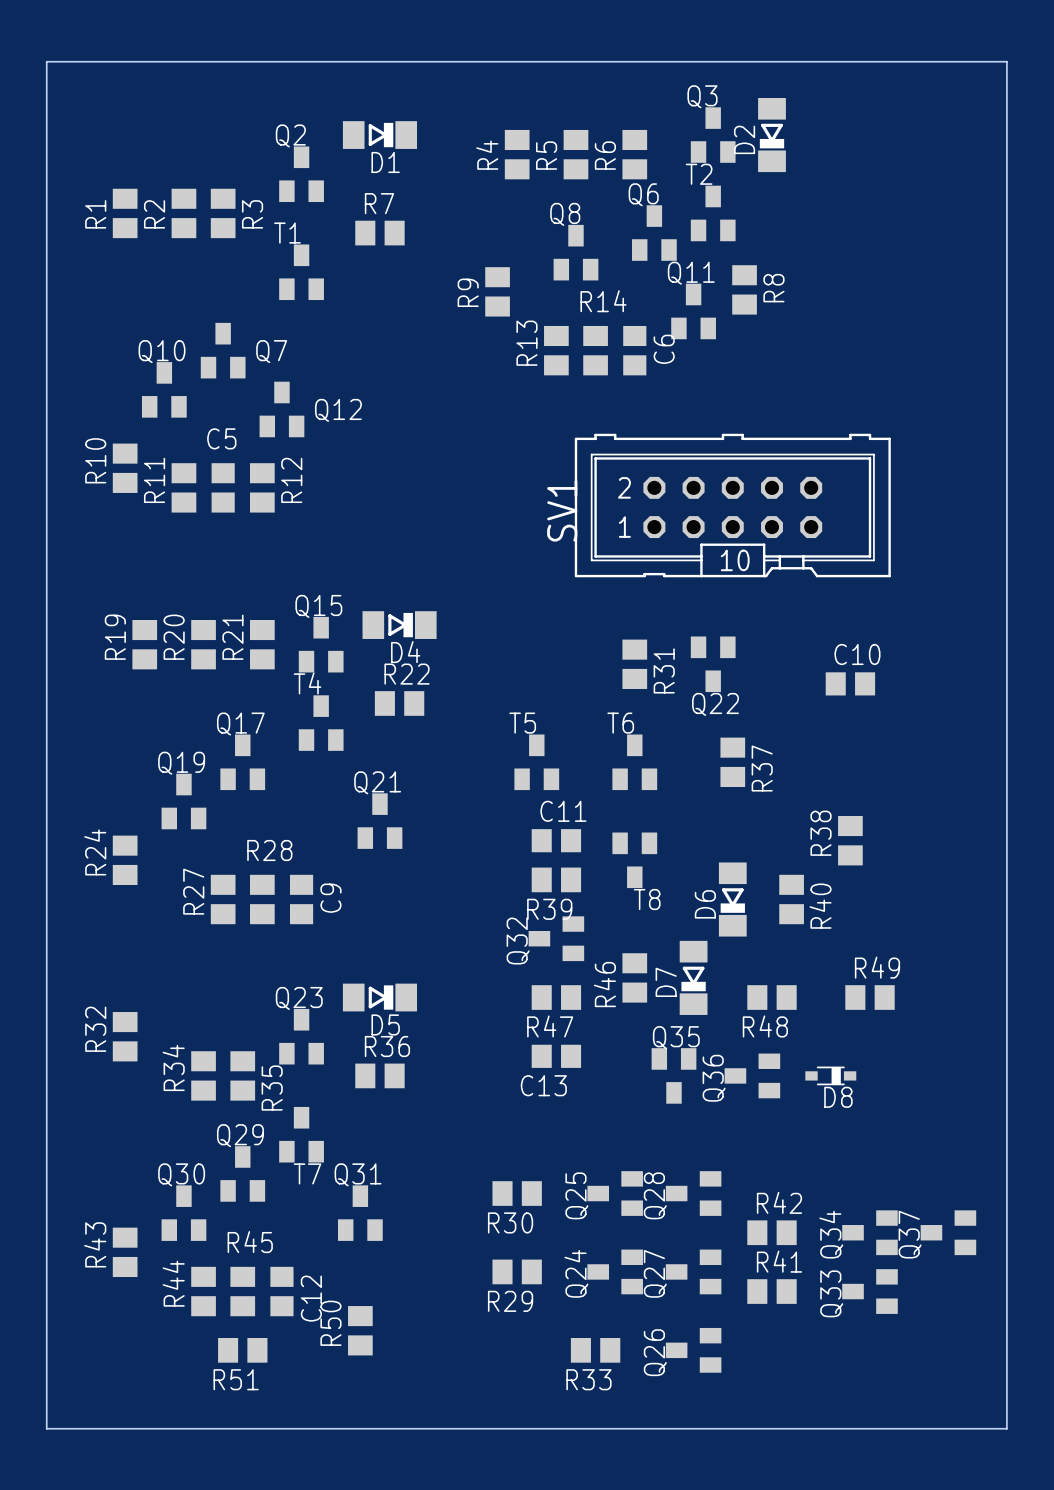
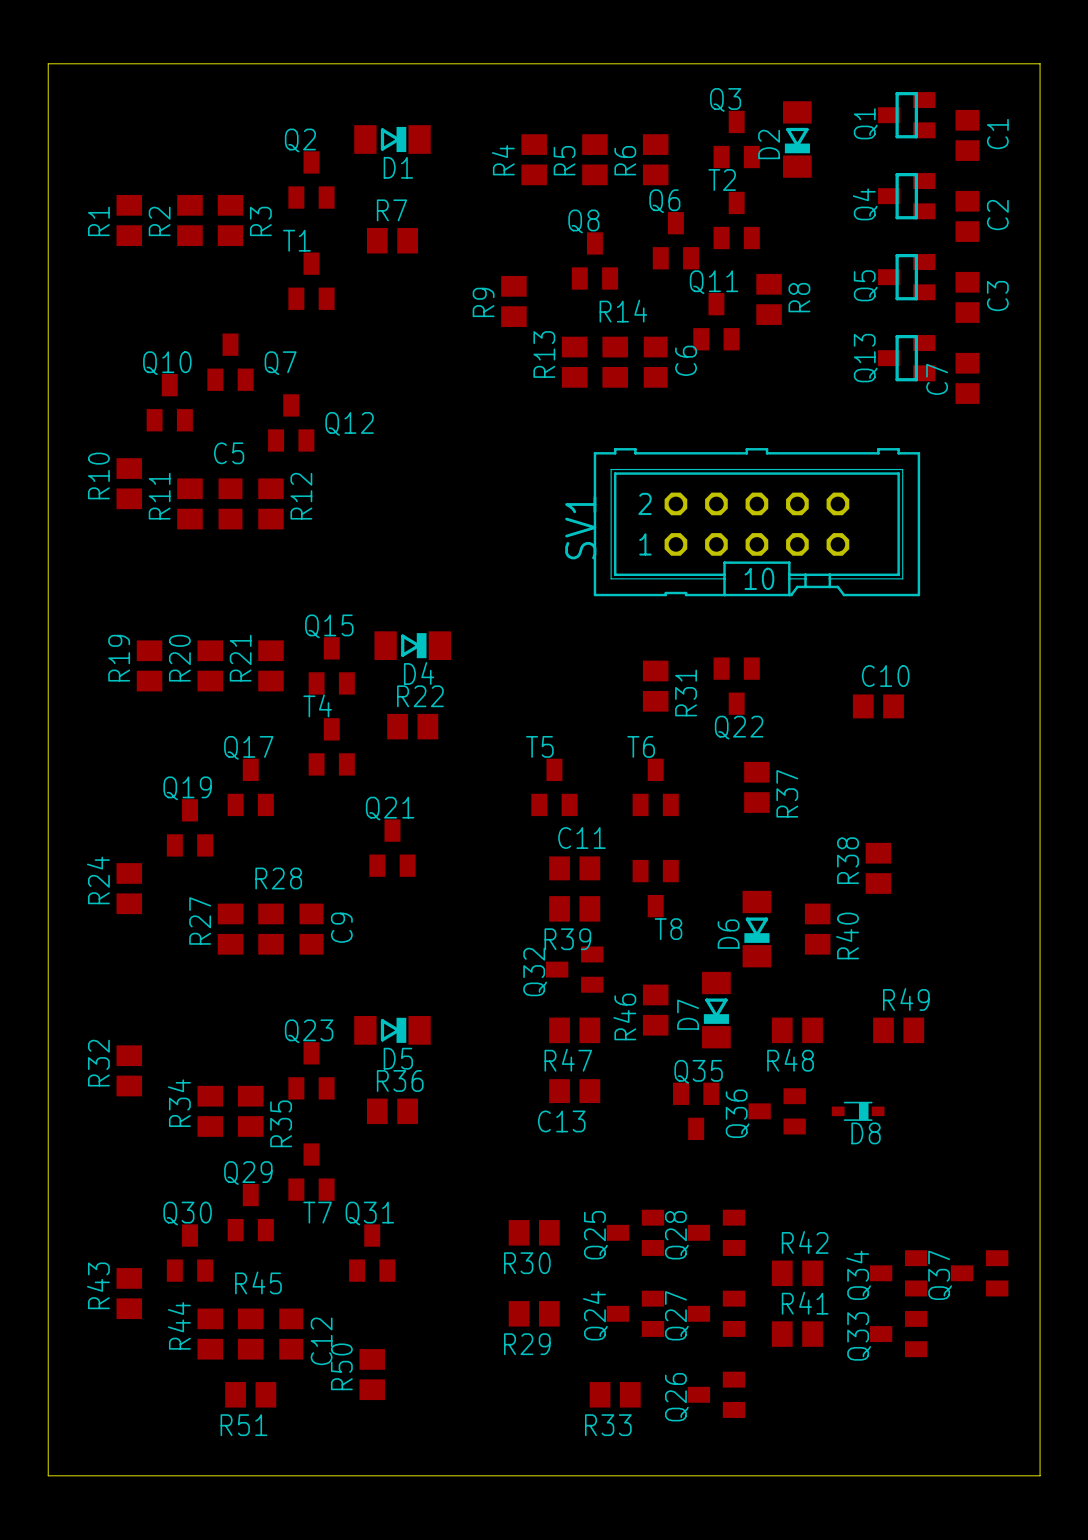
Q1: none -> (906, 115)
C1: none -> (967, 135)
Q4: none -> (906, 196)
C2: none -> (967, 216)
Q5: none -> (906, 277)
C3: none -> (967, 297)
Q13: none -> (906, 358)
C7: none -> (967, 378)

